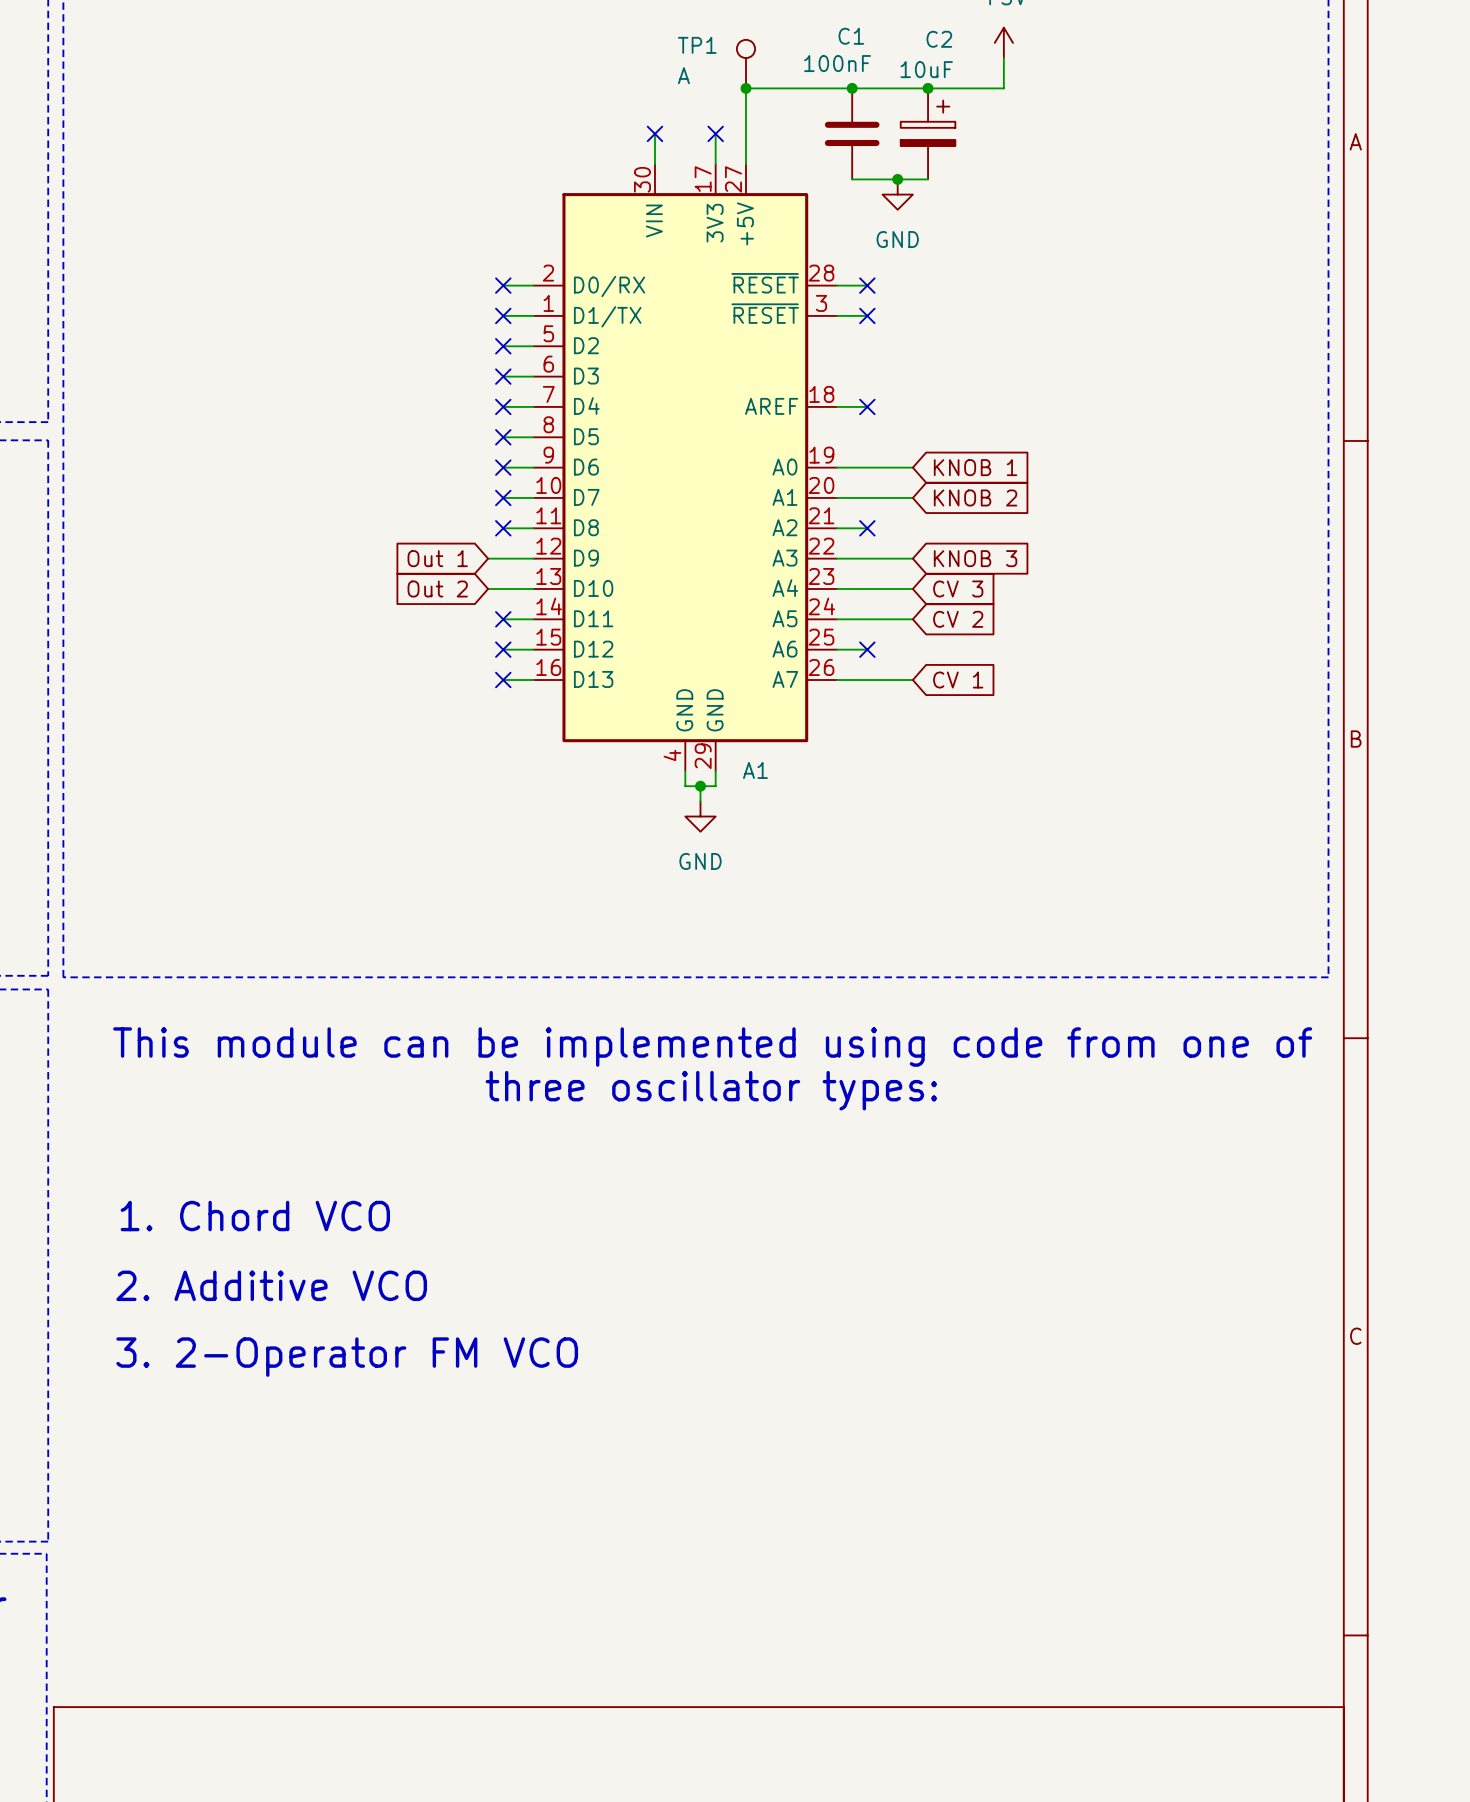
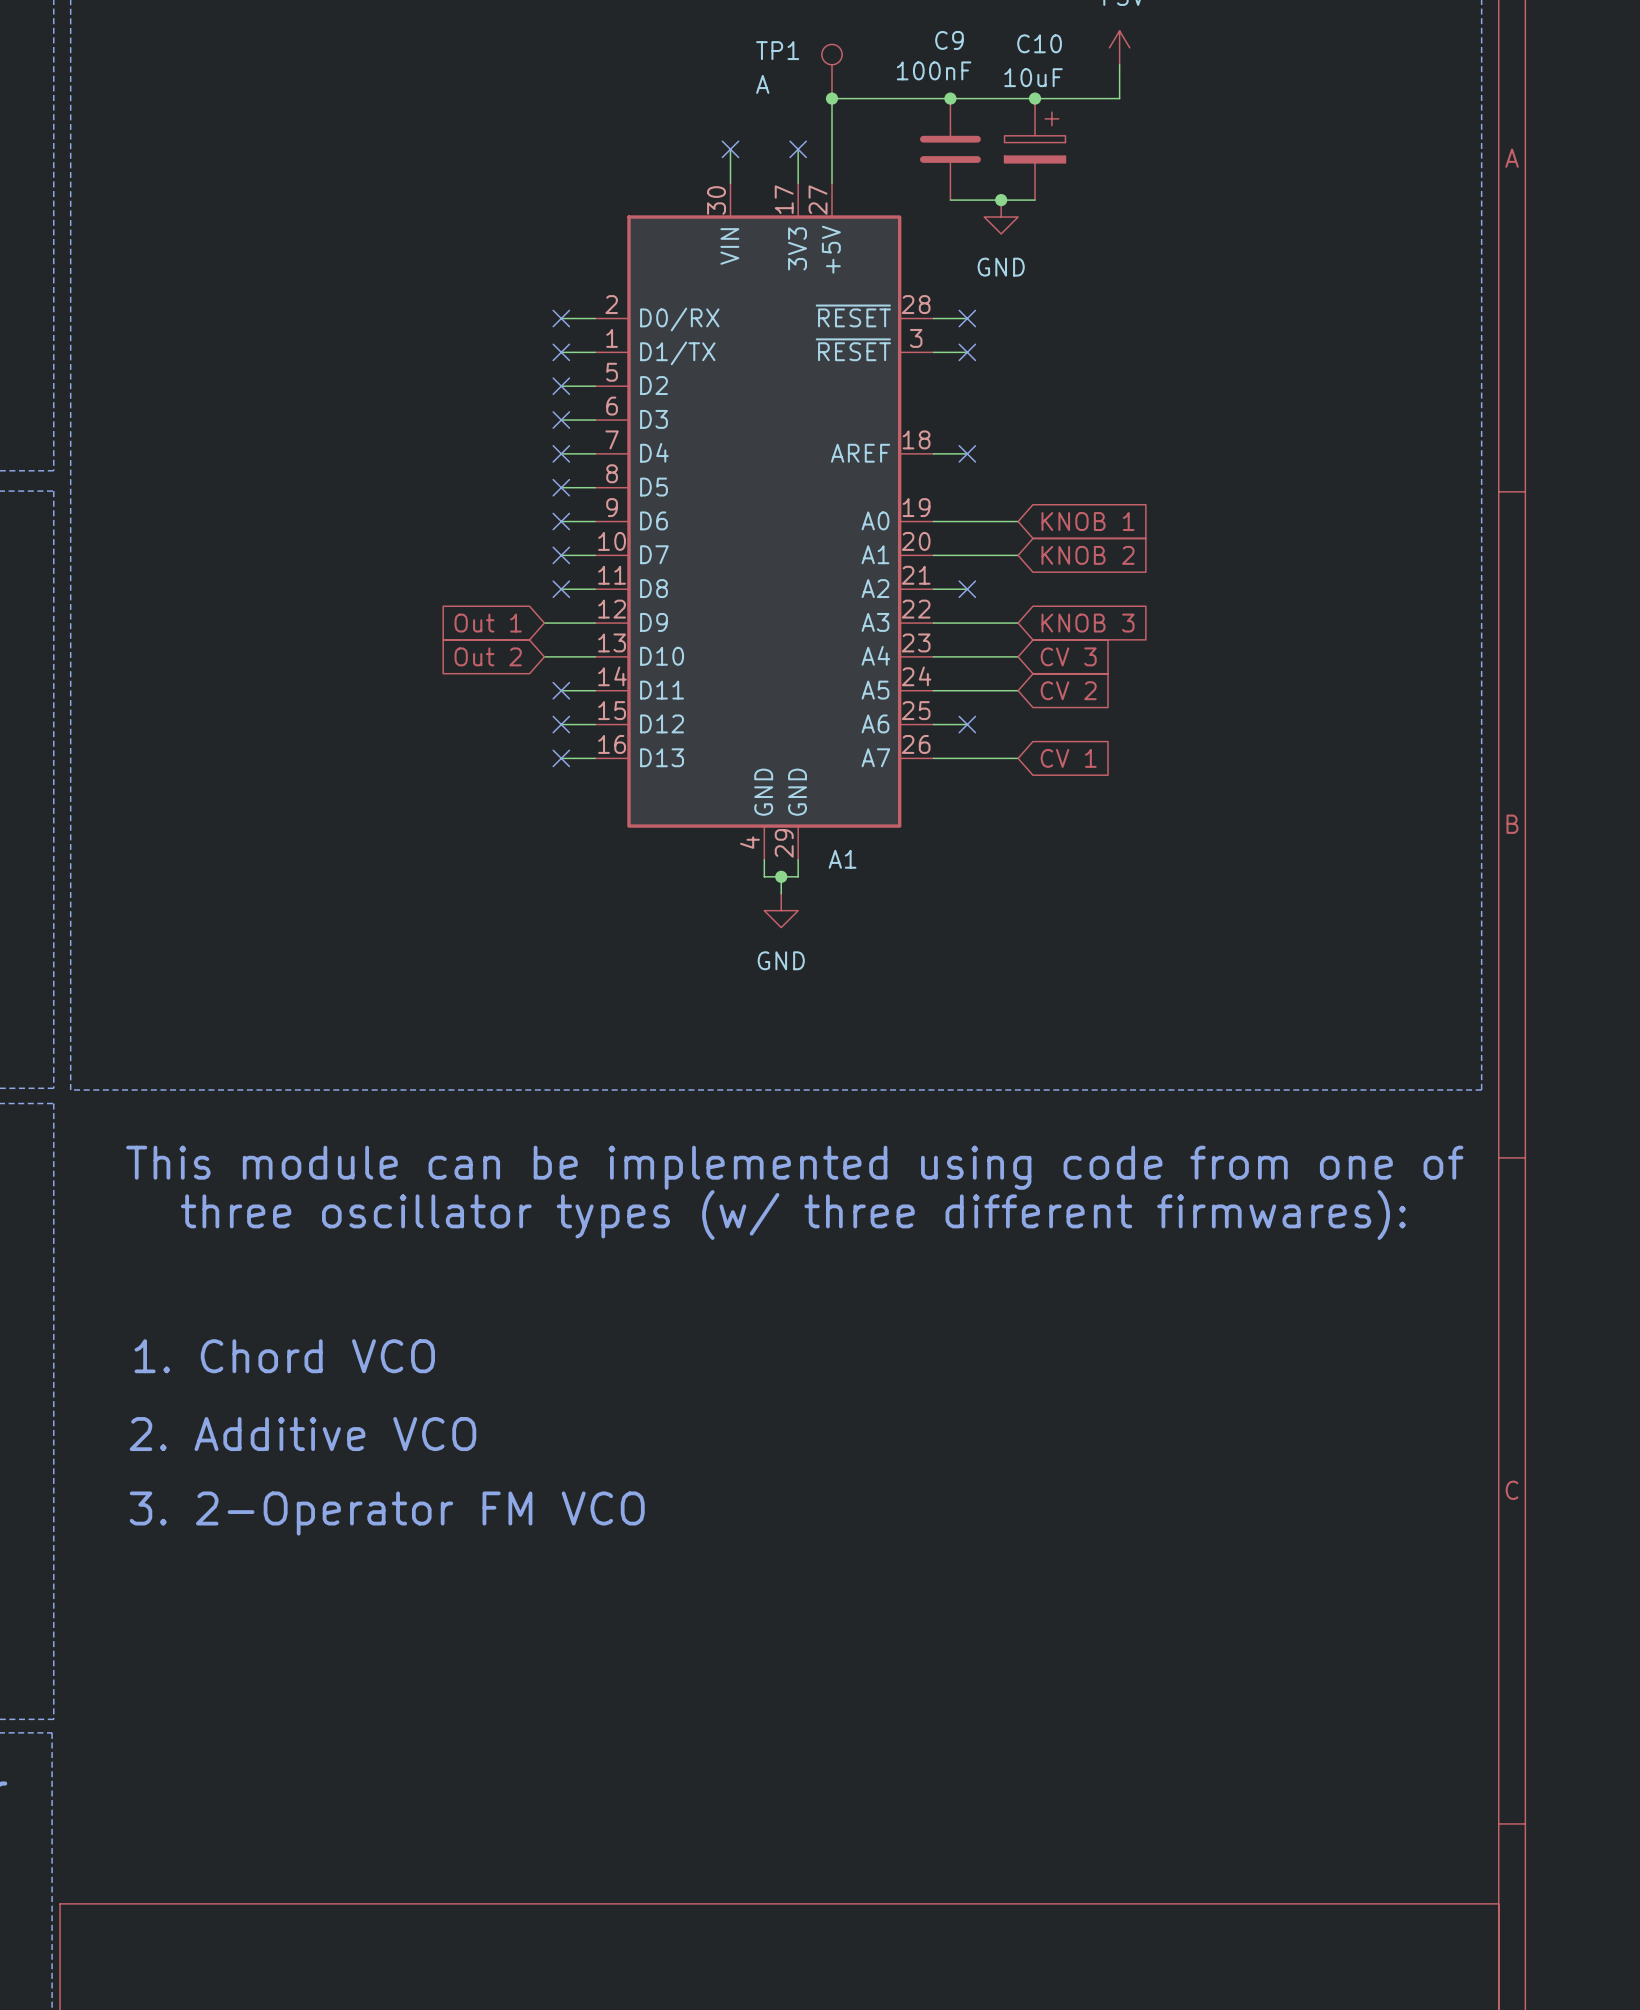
C1 name: C1 (851, 36) -> C9 (949, 40)
C2 name: C2 (939, 39) -> C10 (1039, 43)
text: three oscillator types: (711, 1090) -> three oscillator types (w/ three different firmwares): (793, 1214)

